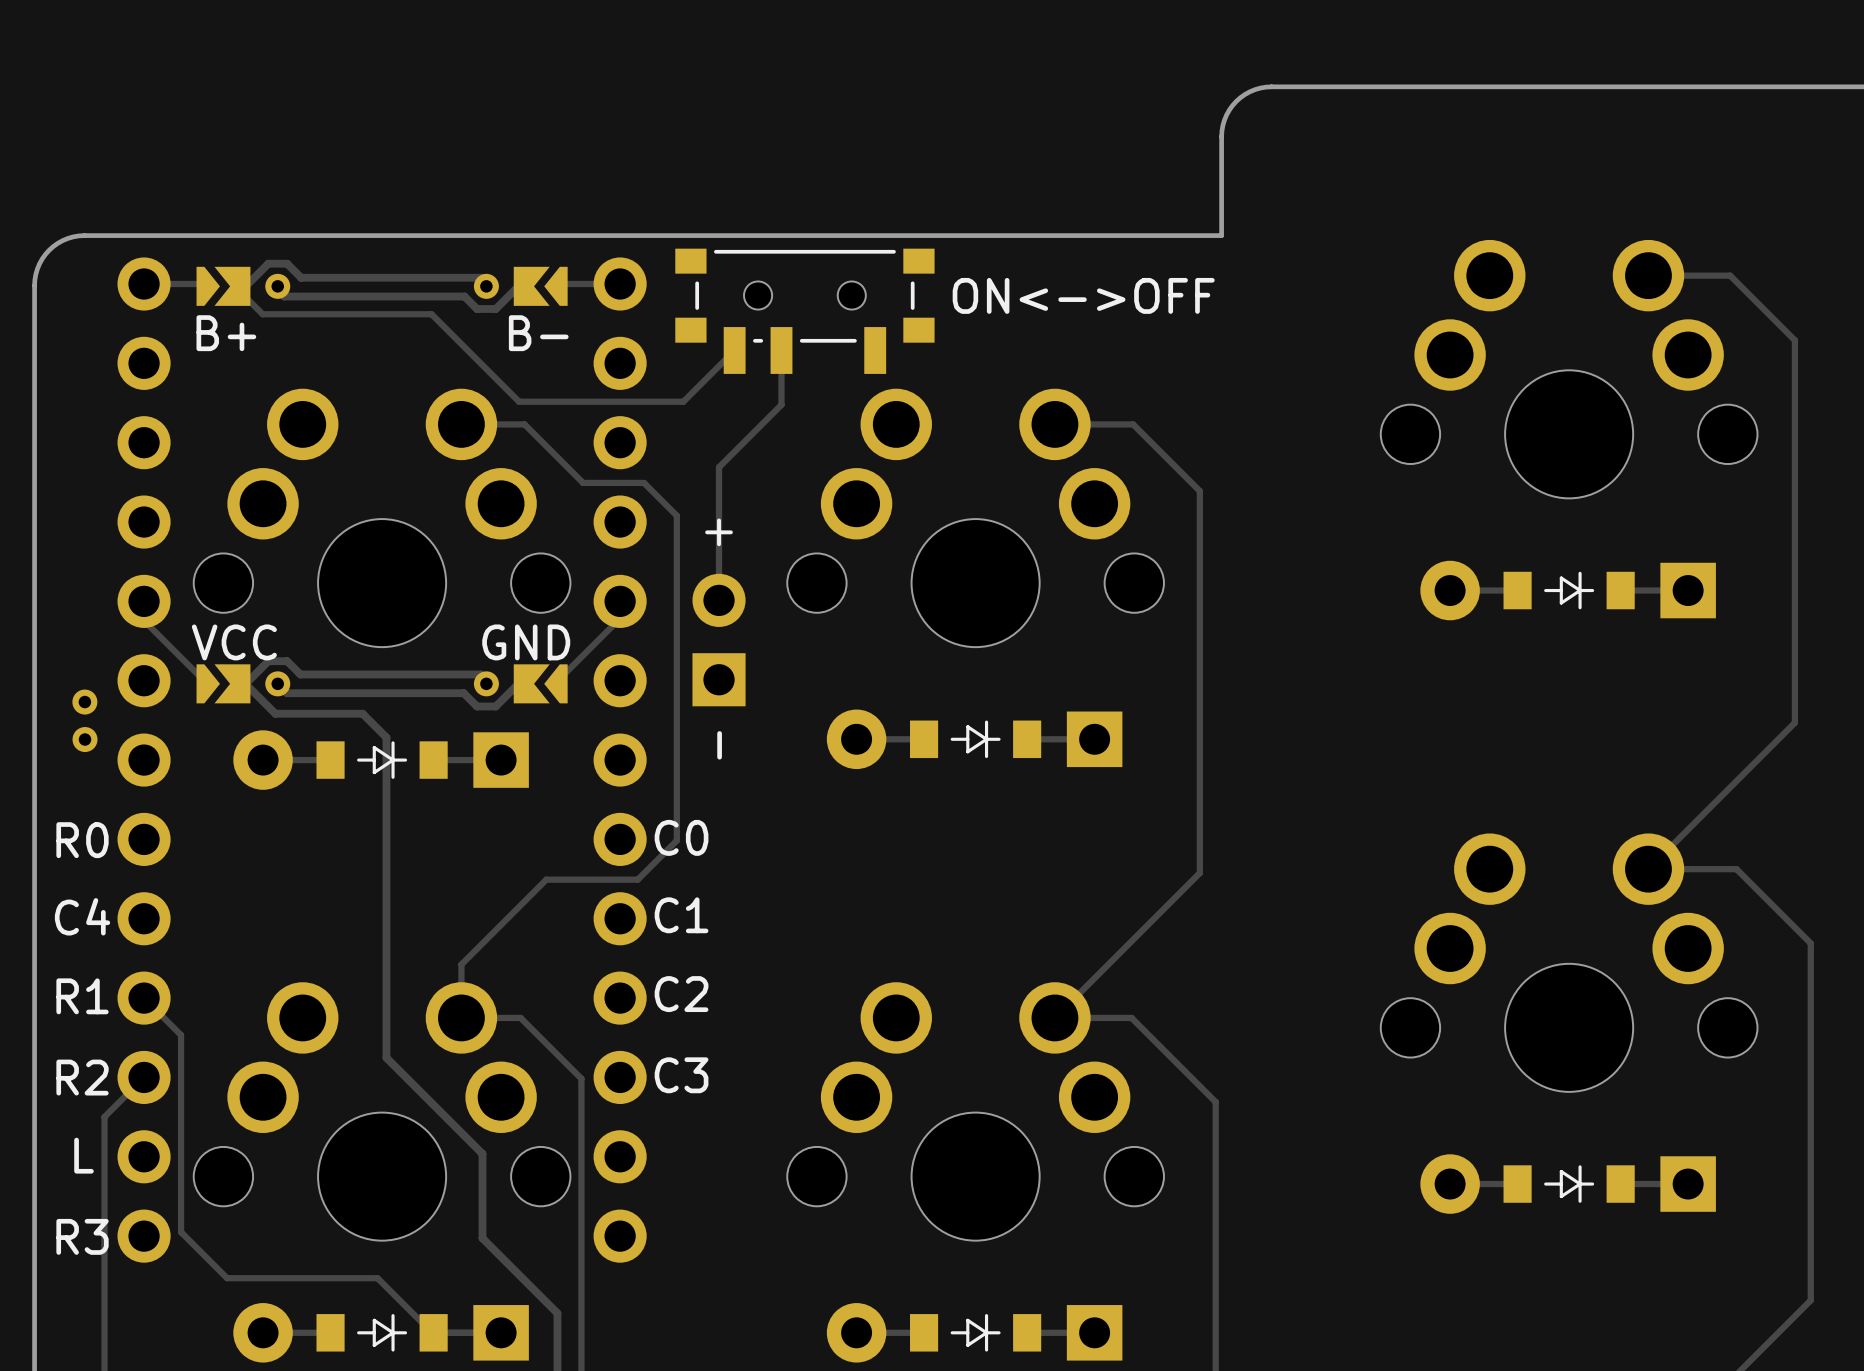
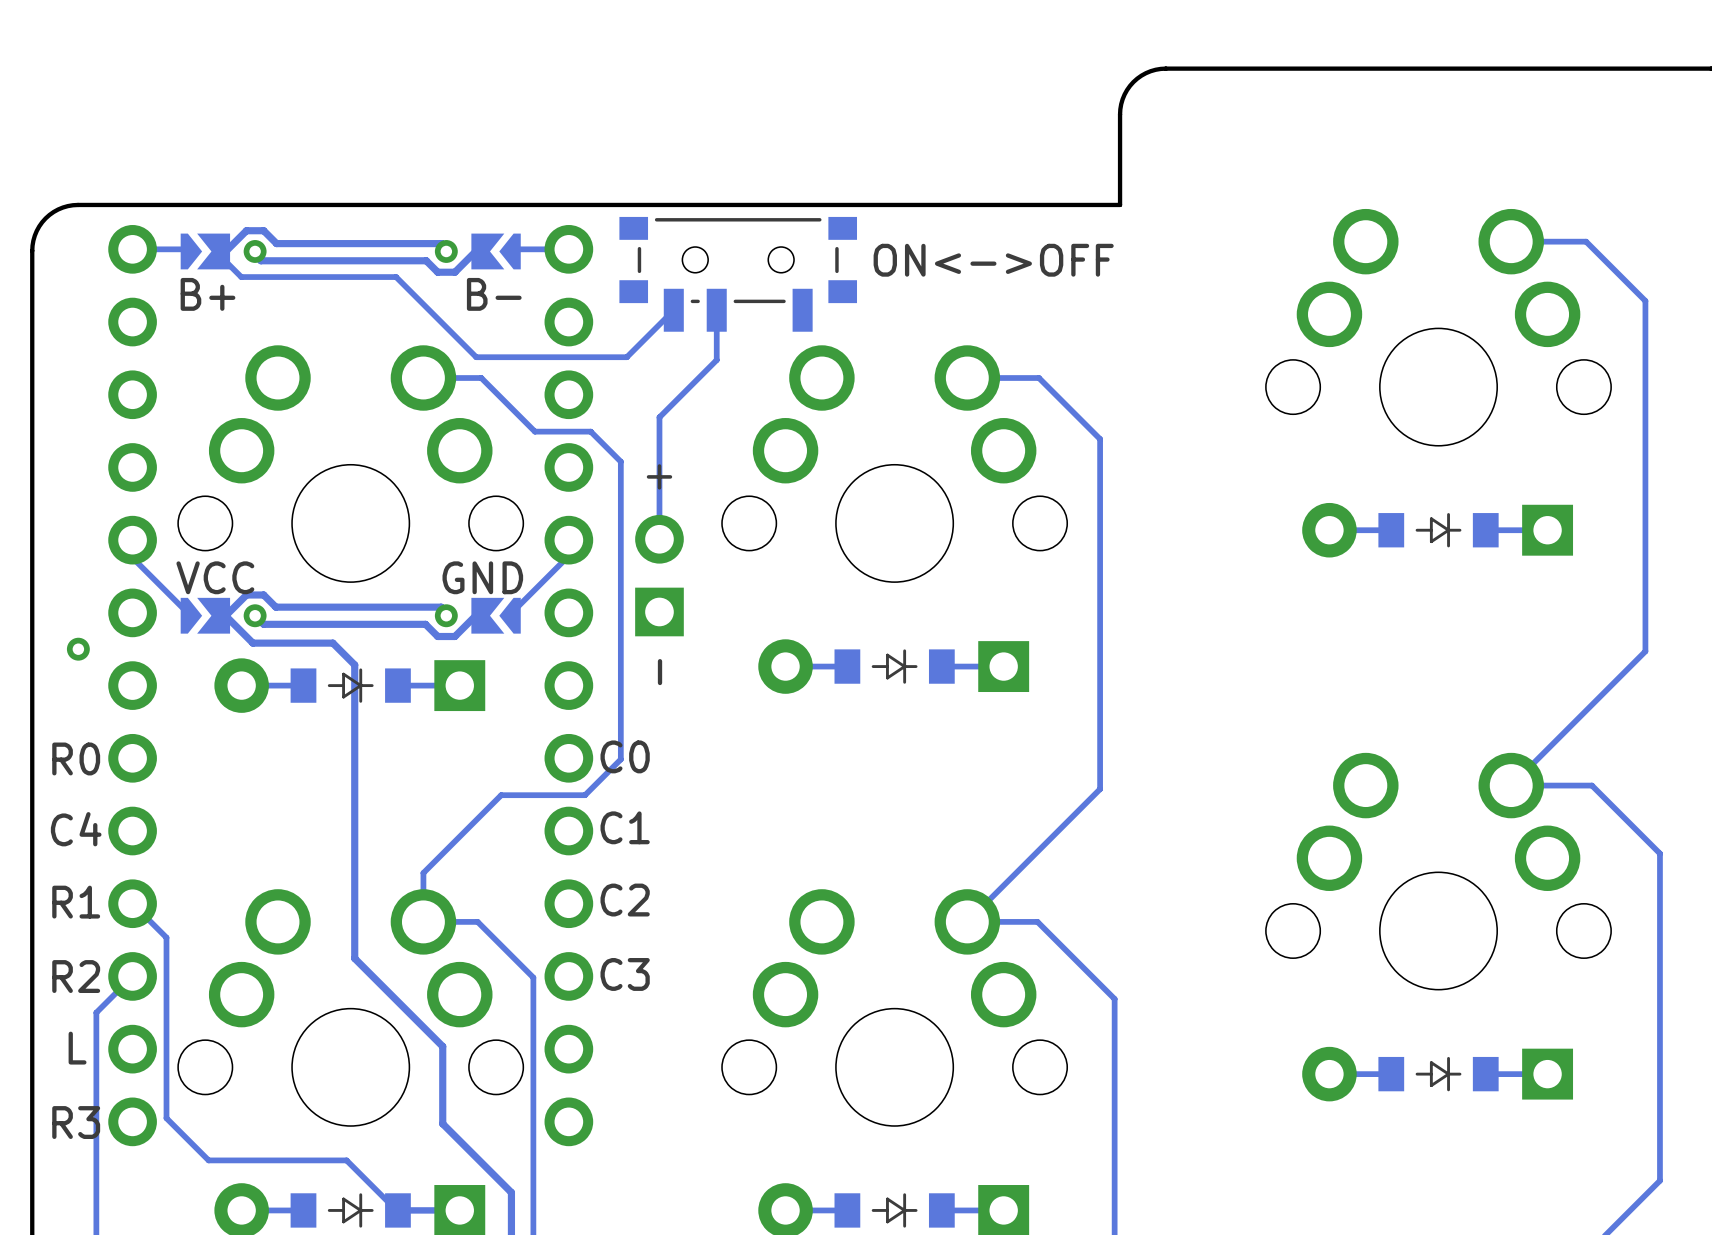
part: (84, 702) -> none
part: none -> (78, 649)
part: (85, 739) -> none

